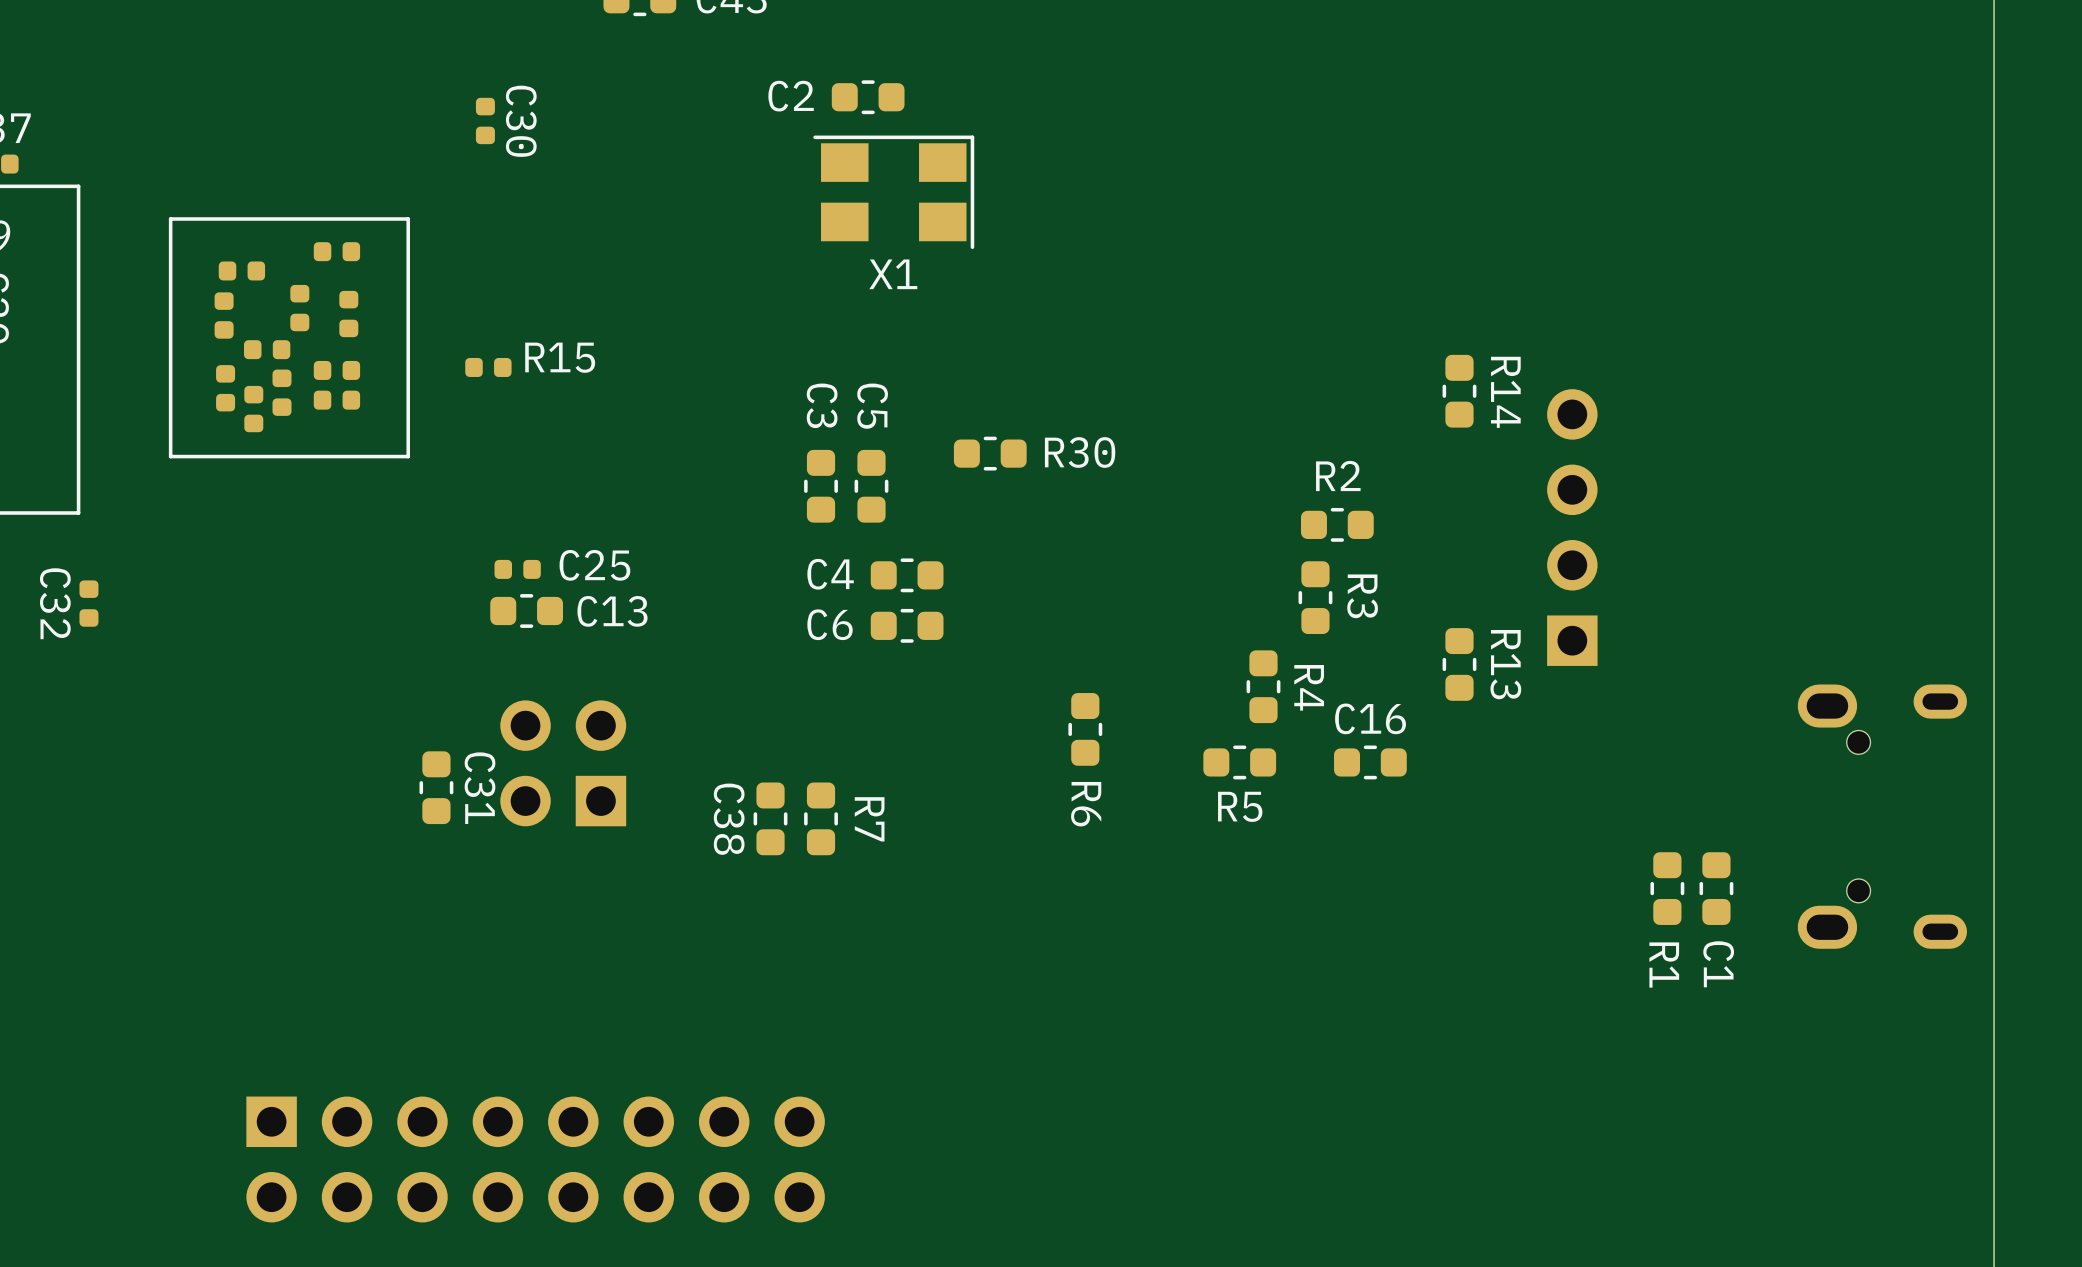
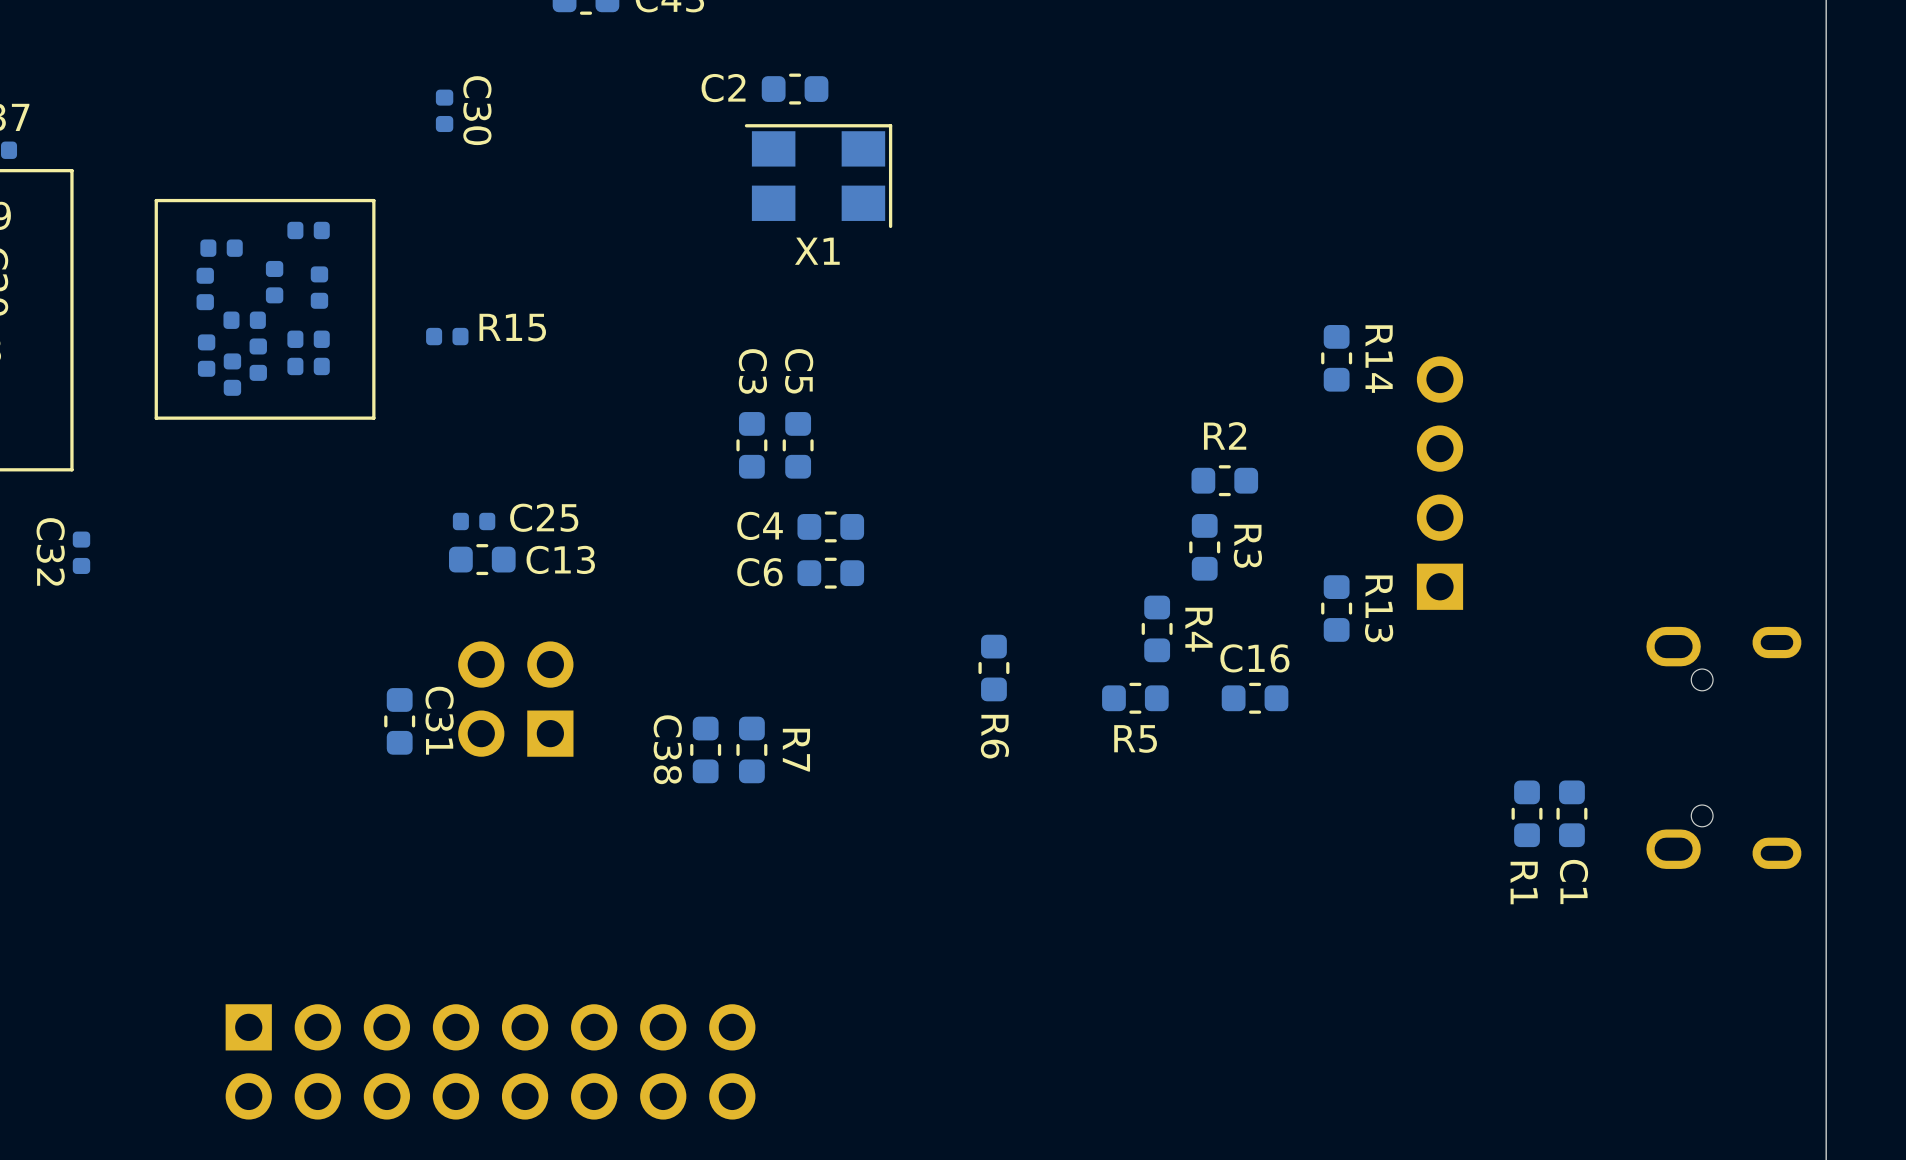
R30: (990, 453) -> none

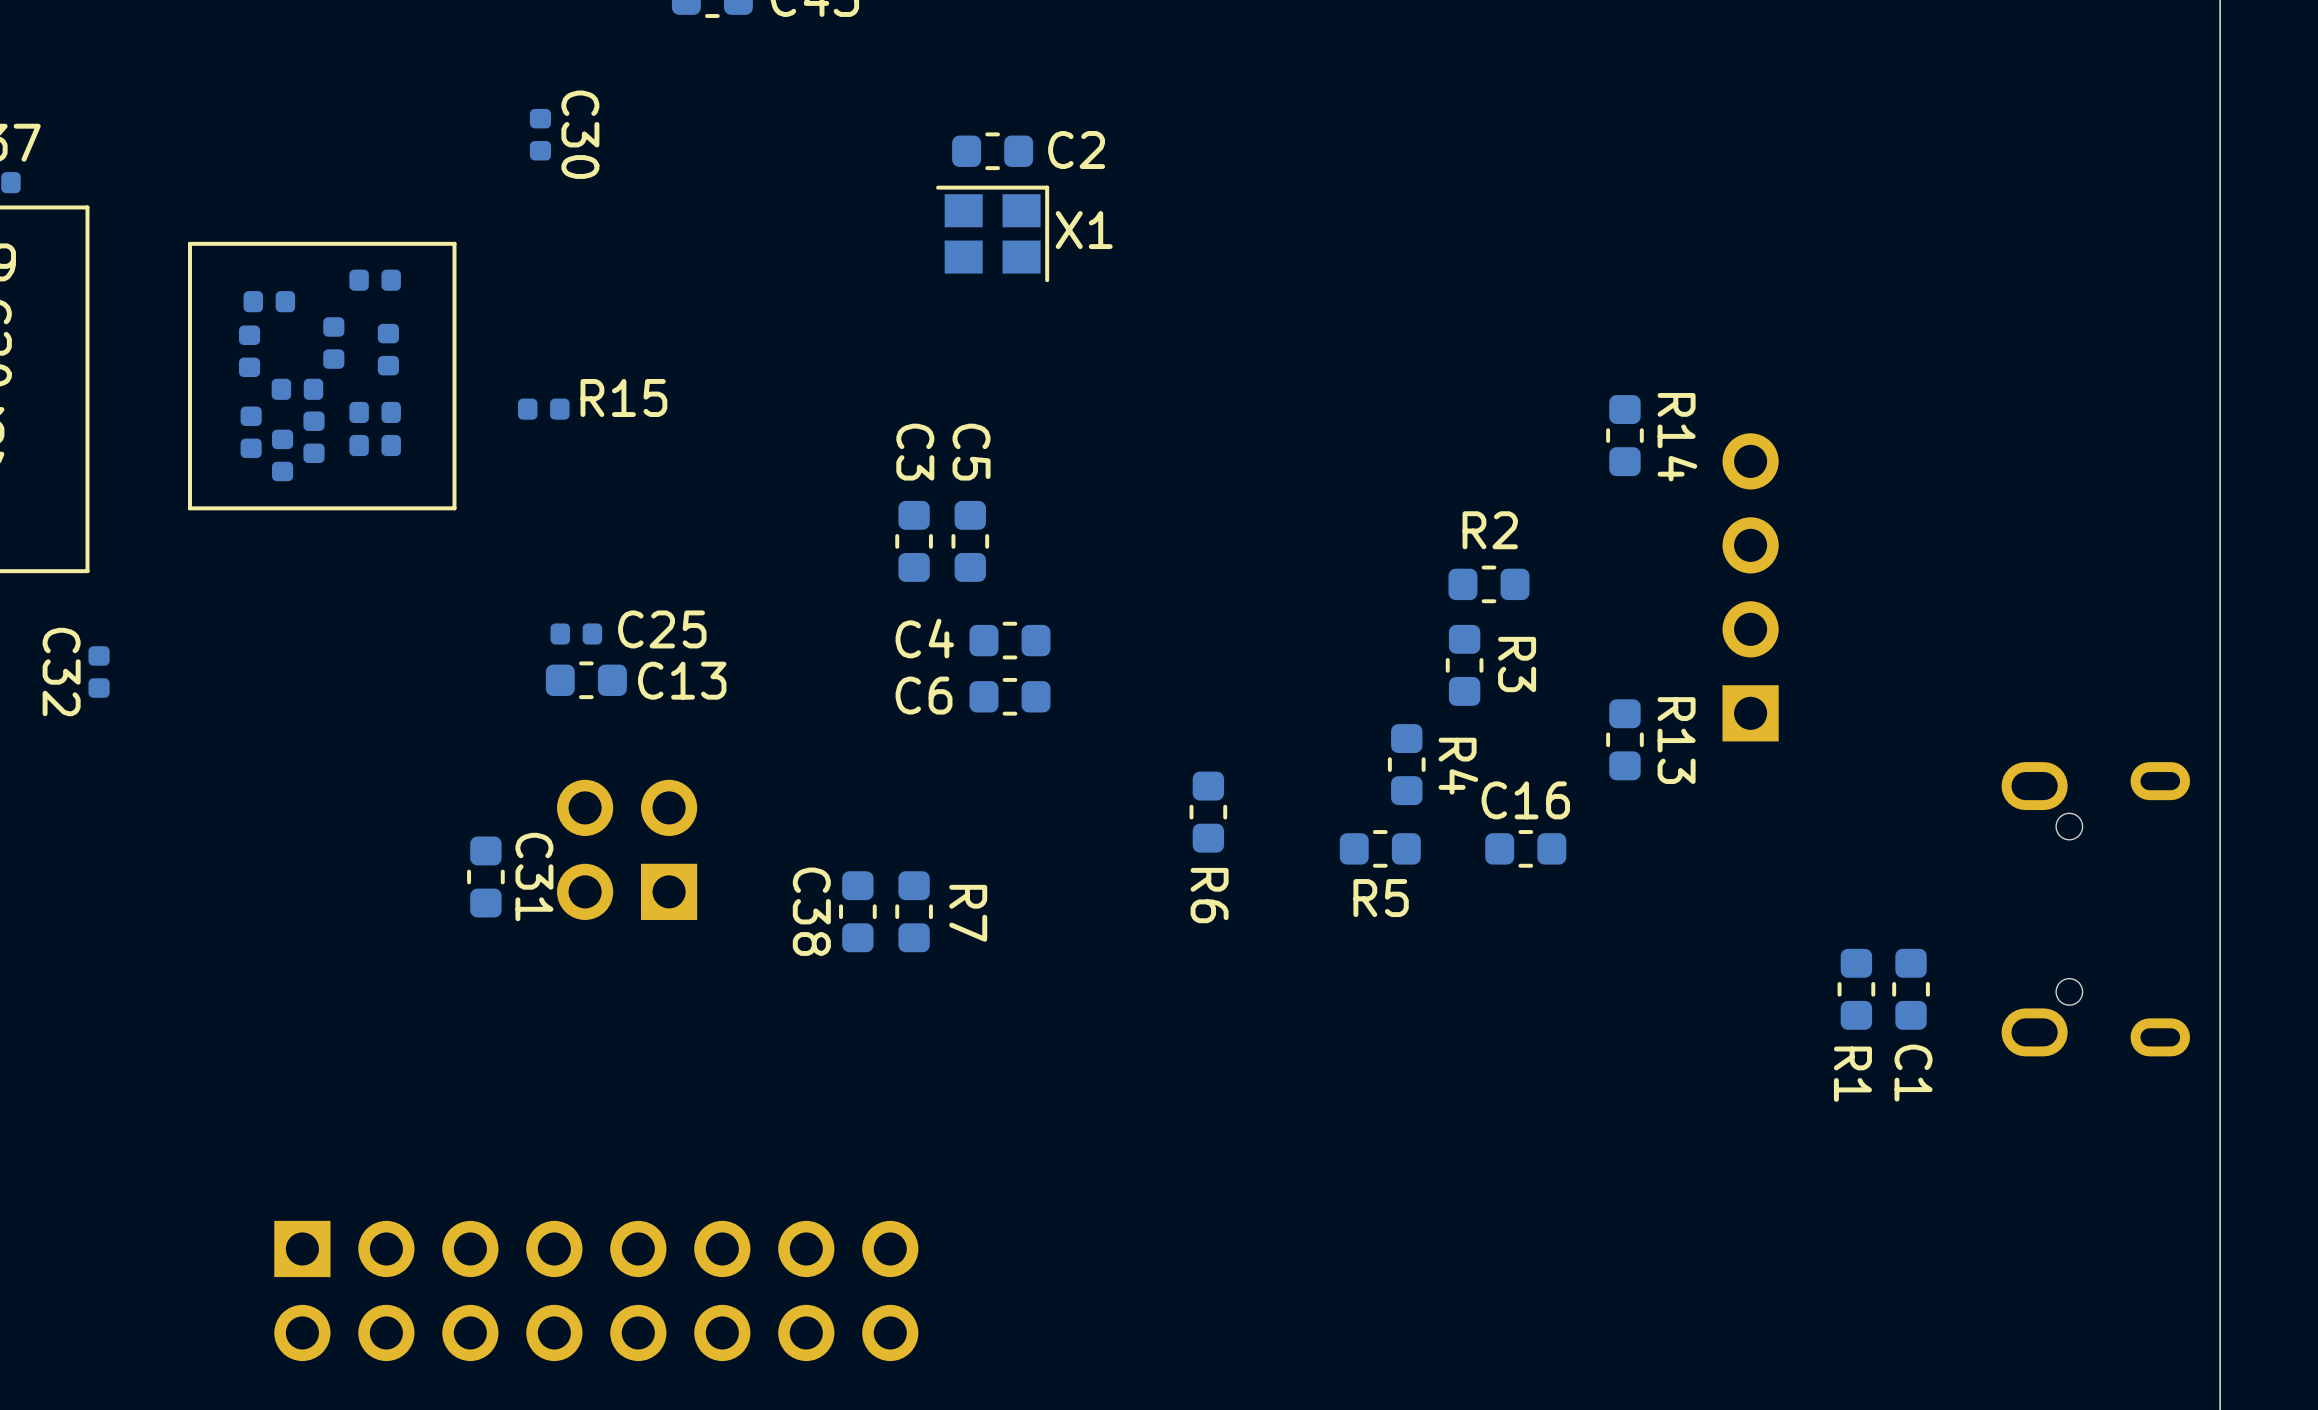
C2 name position: C2 (723, 88) -> C2 (1076, 150)
C2 position: (795, 89) -> (992, 151)
X1 footprint: [744, 124, 893, 229] -> [936, 185, 1050, 283]
X1 name position: X1 (817, 251) -> X1 (1084, 230)

